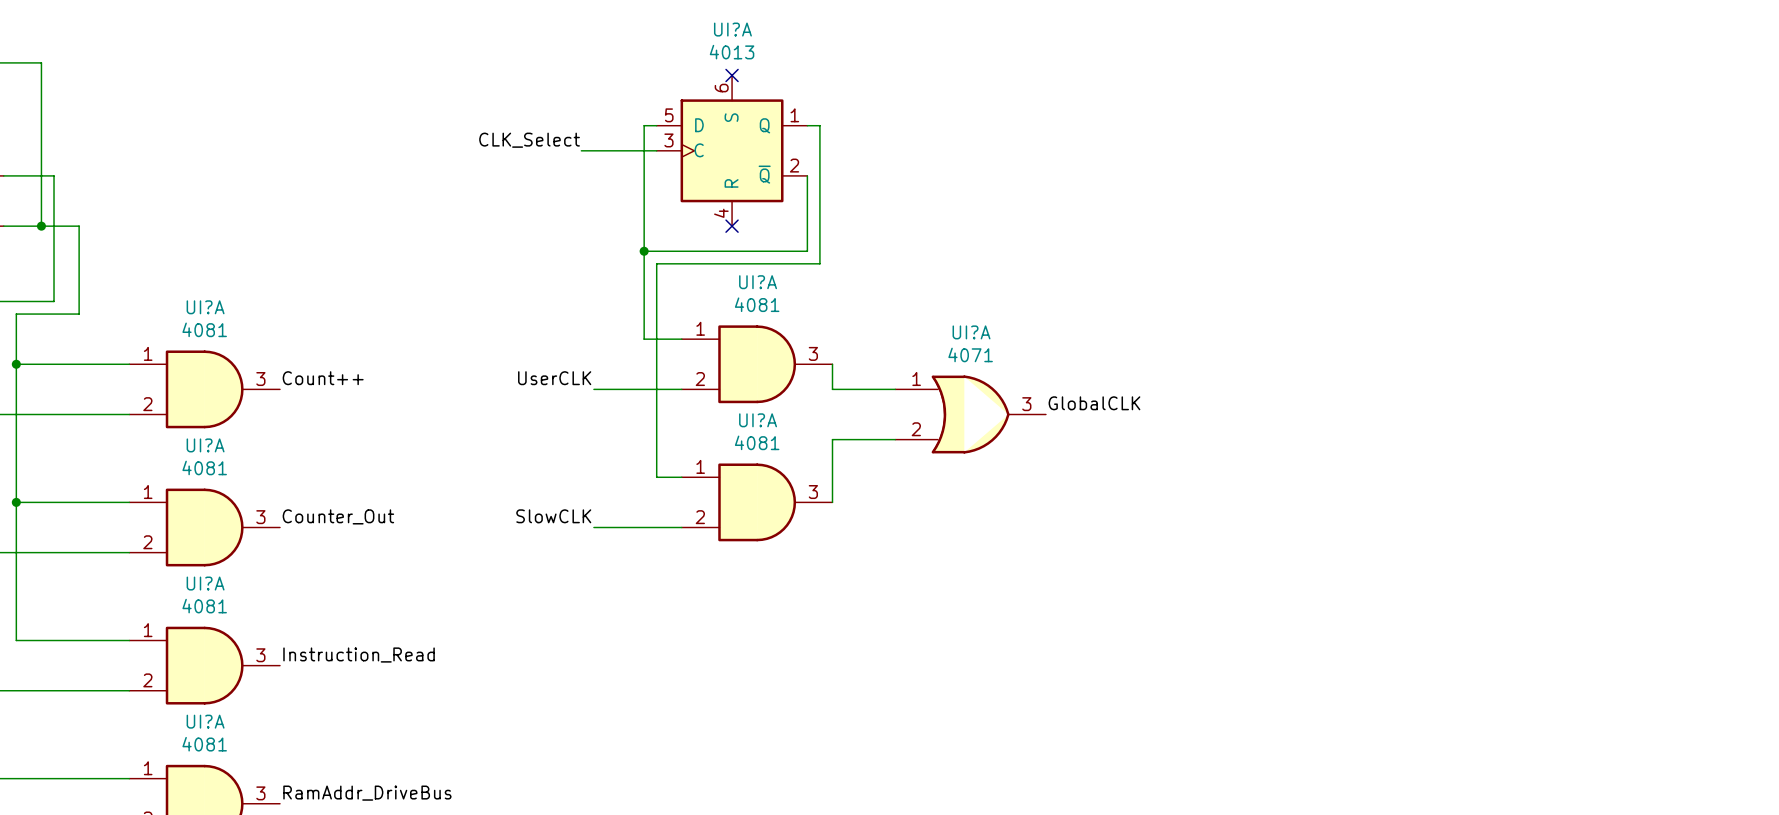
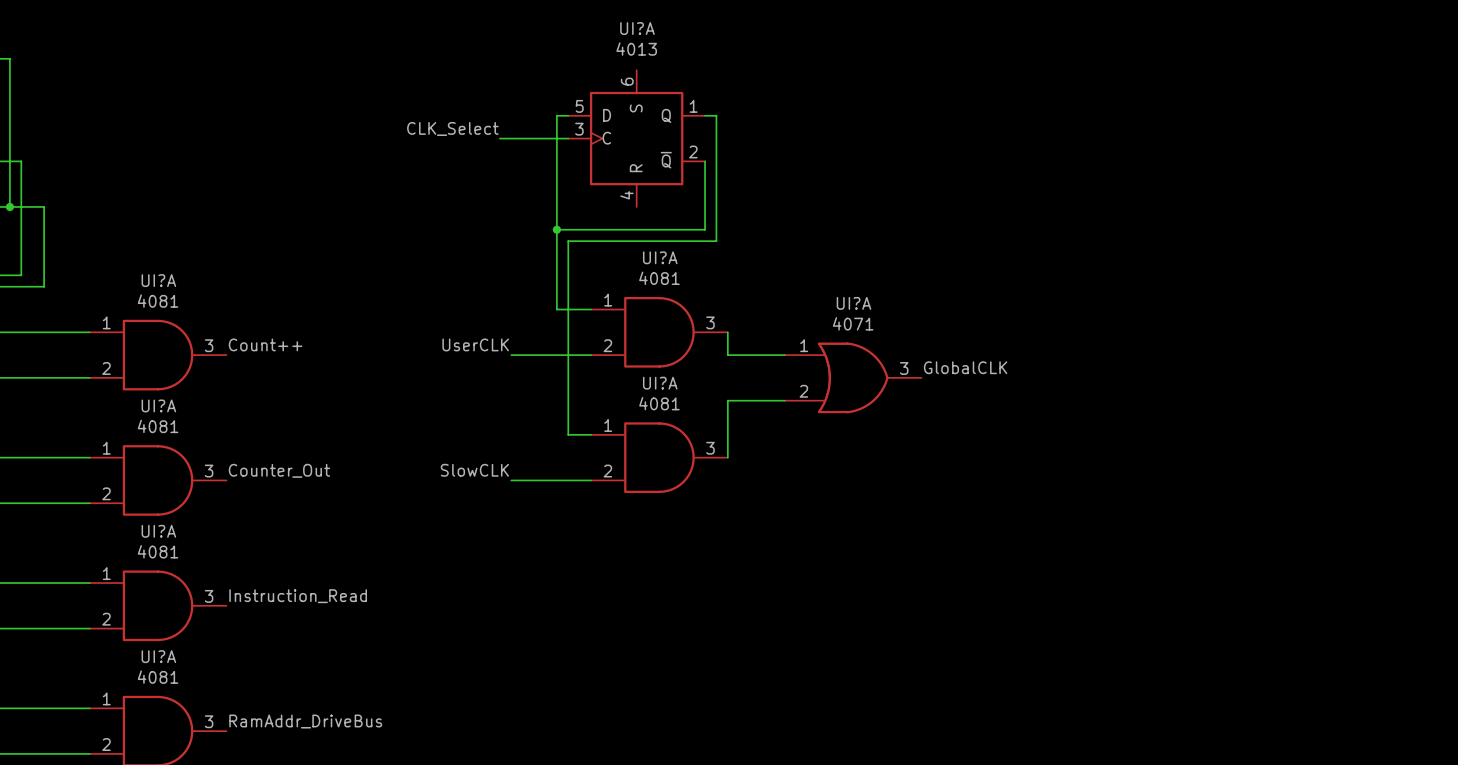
no-connect mark: (732, 75) -> none
no-connect mark: (732, 226) -> none

